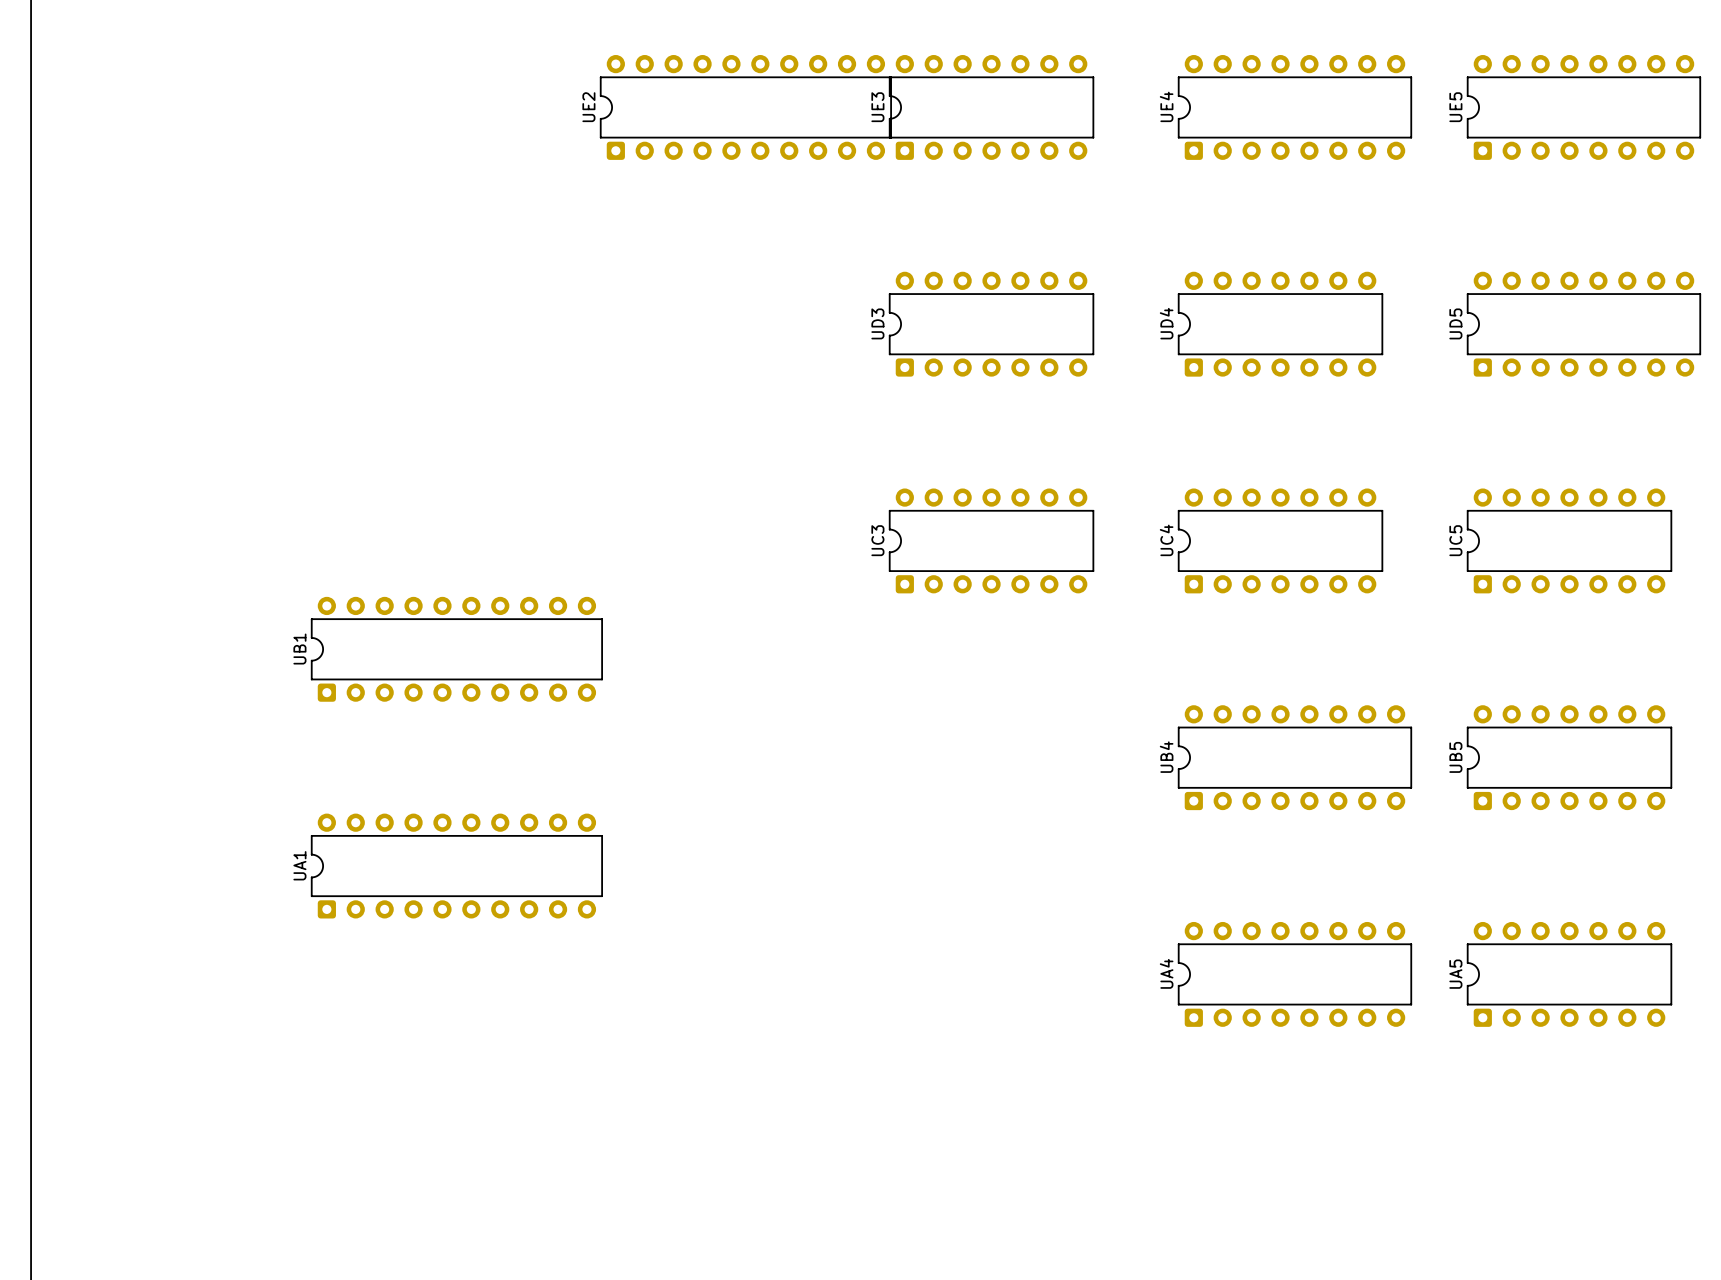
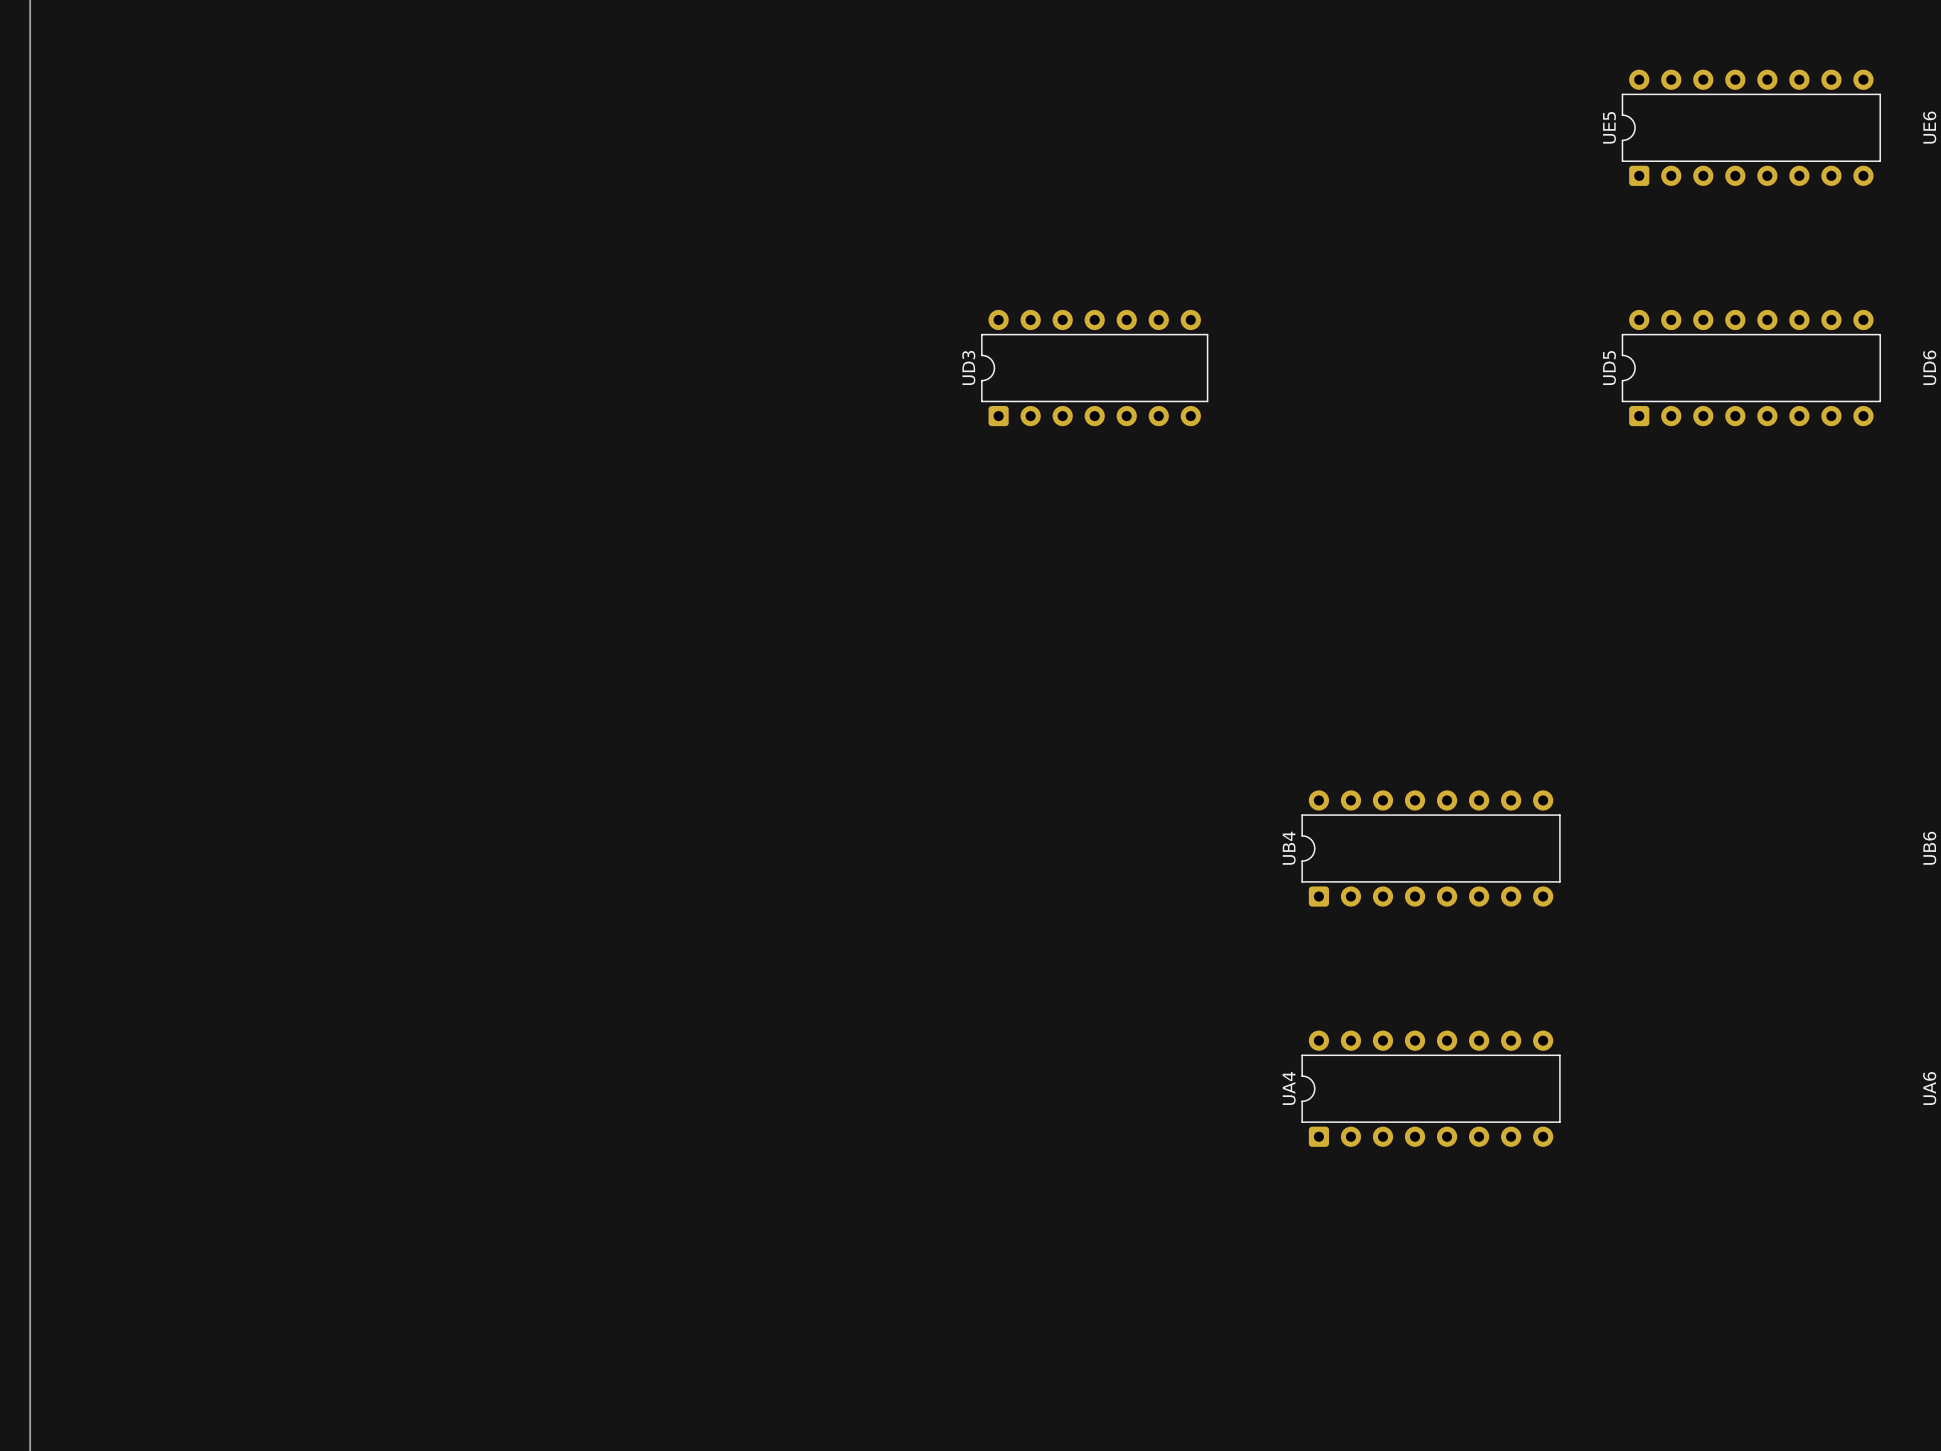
UE2: (745, 107) -> none
UE3: (991, 107) -> none
UE4: (1294, 107) -> none
UD4: (1280, 324) -> none
UC3: (991, 540) -> none
UC4: (1280, 540) -> none
UC5: (1569, 540) -> none
UB1: (456, 649) -> none
UB5: (1569, 757) -> none
UA1: (456, 866) -> none
UA5: (1569, 974) -> none

